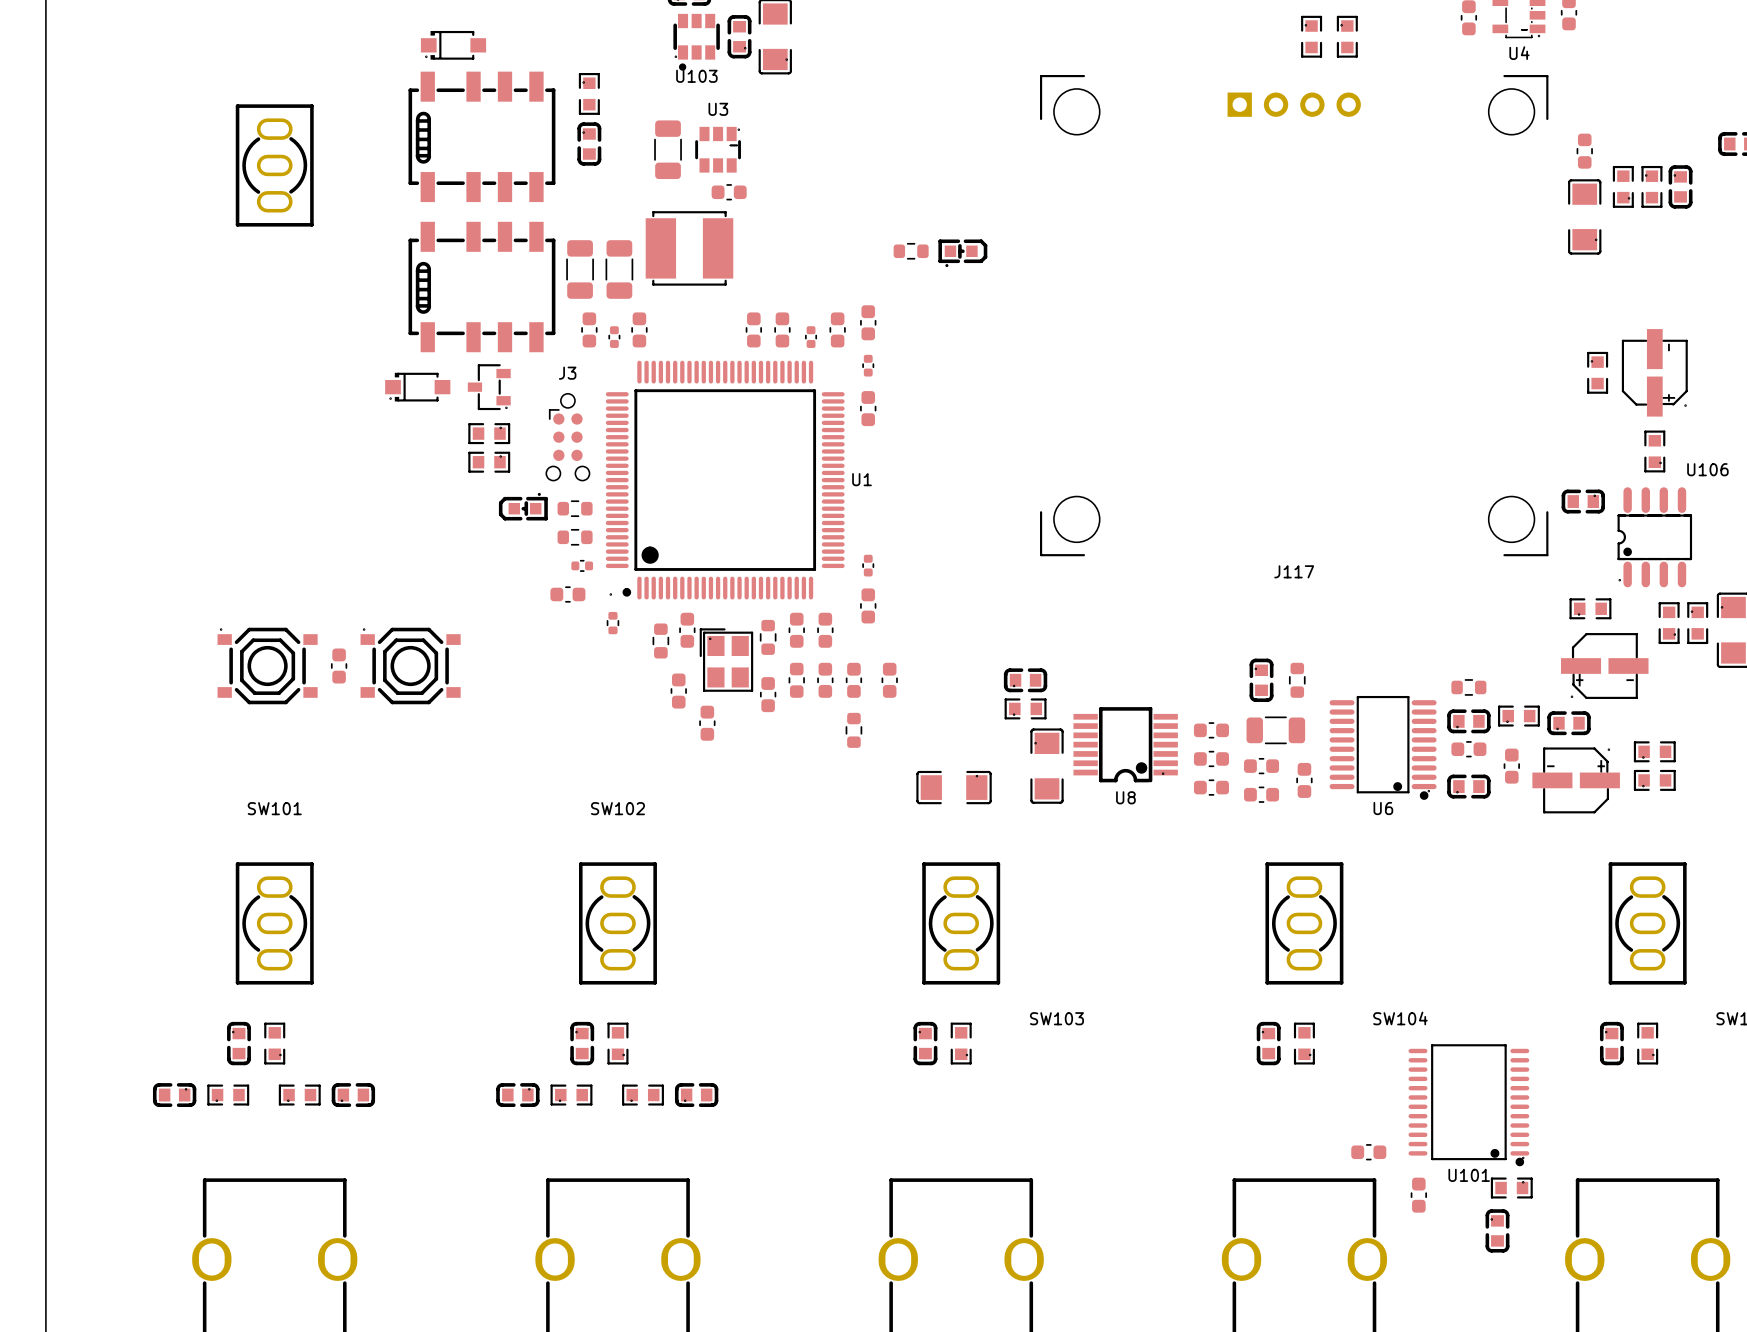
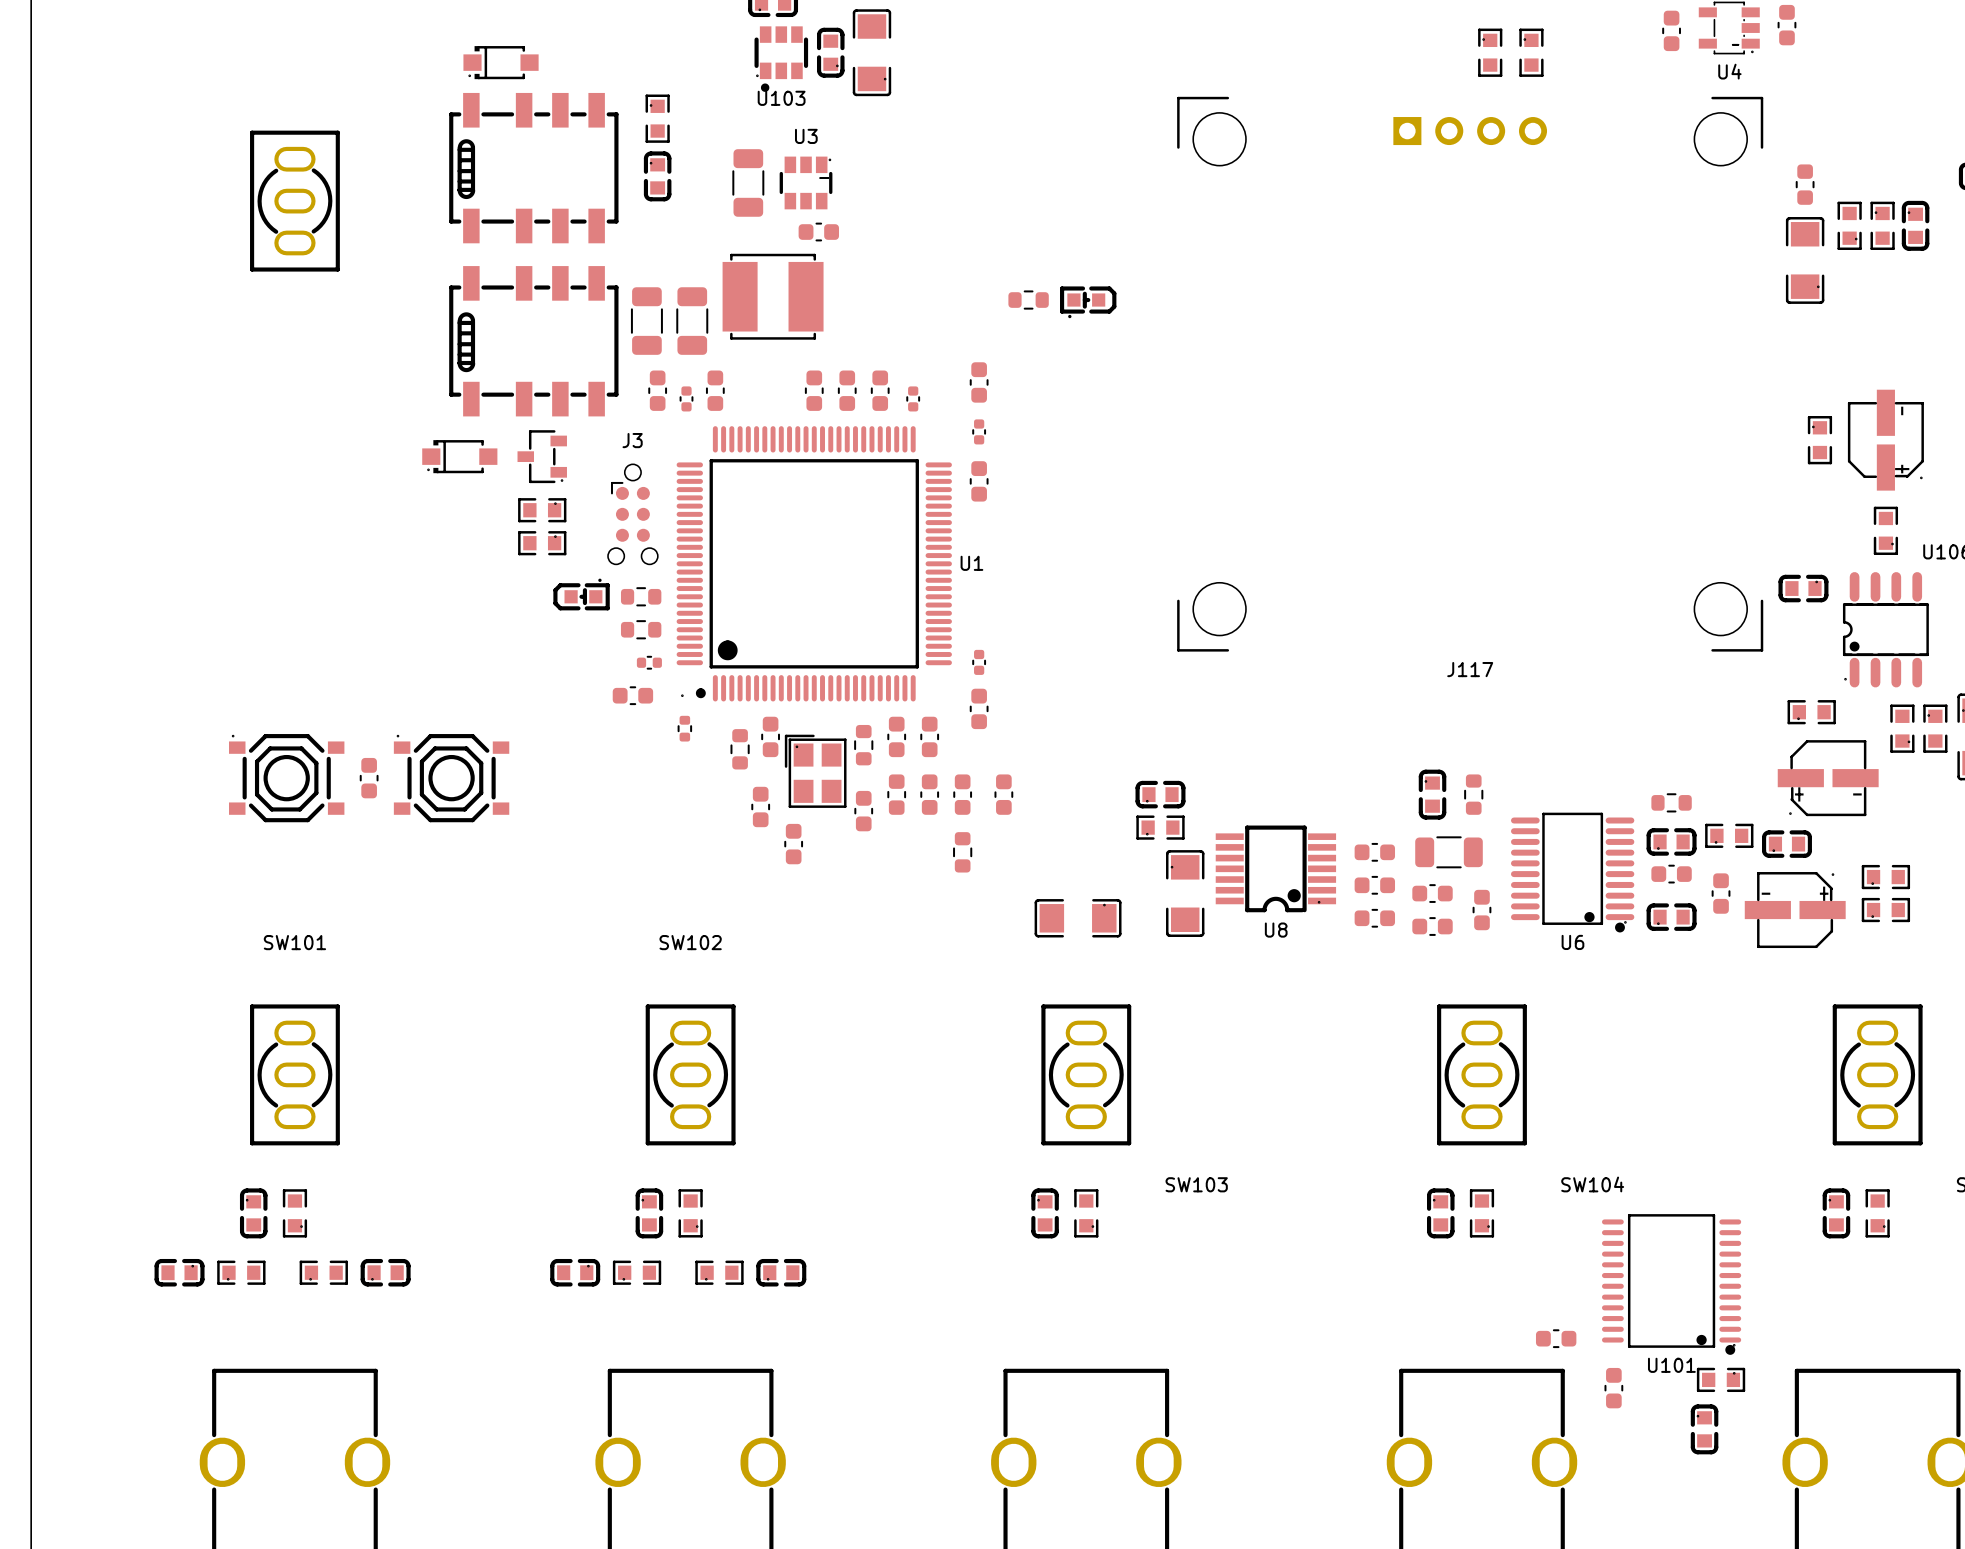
part position: (837, 329) -> (814, 390)

